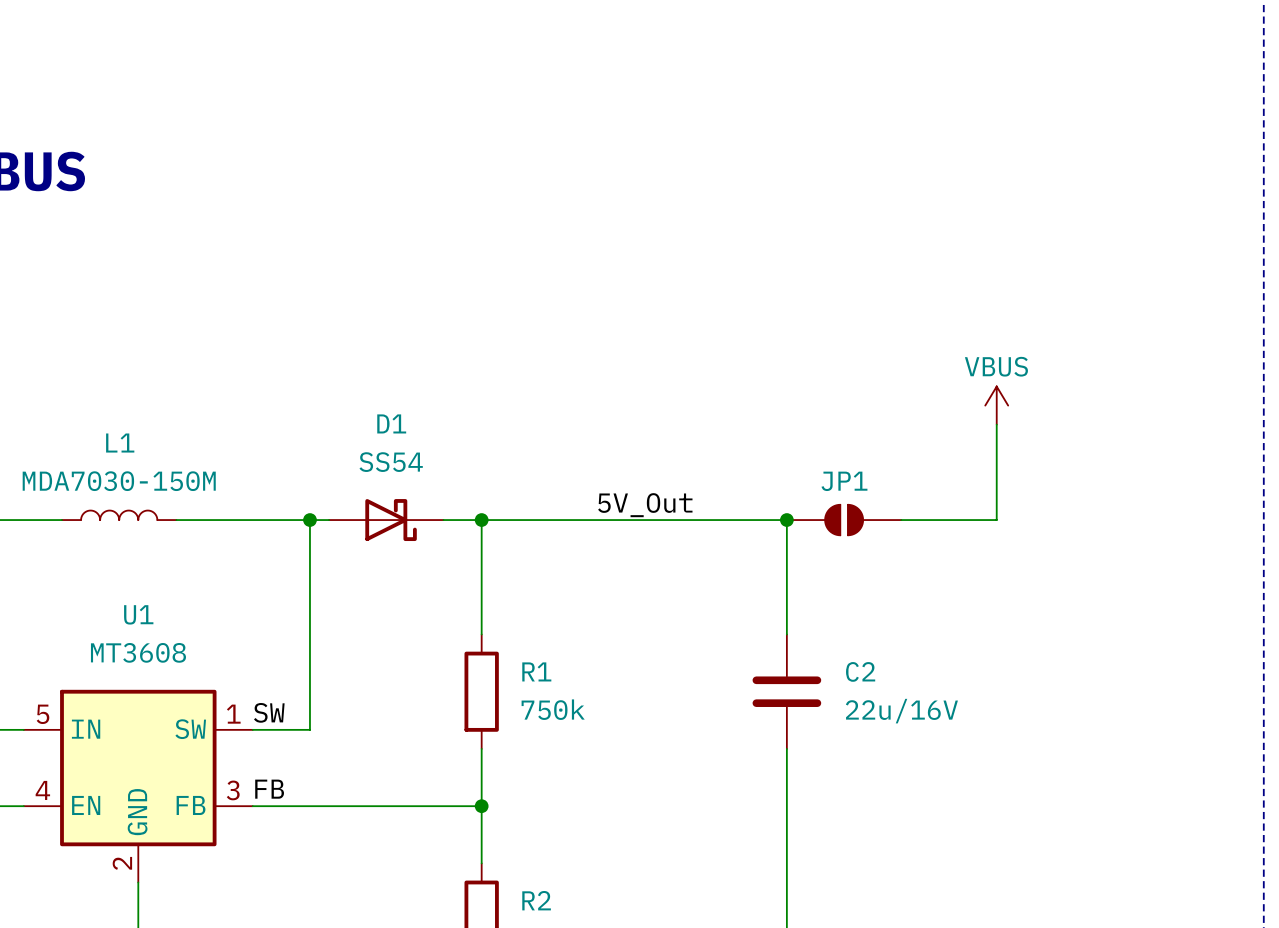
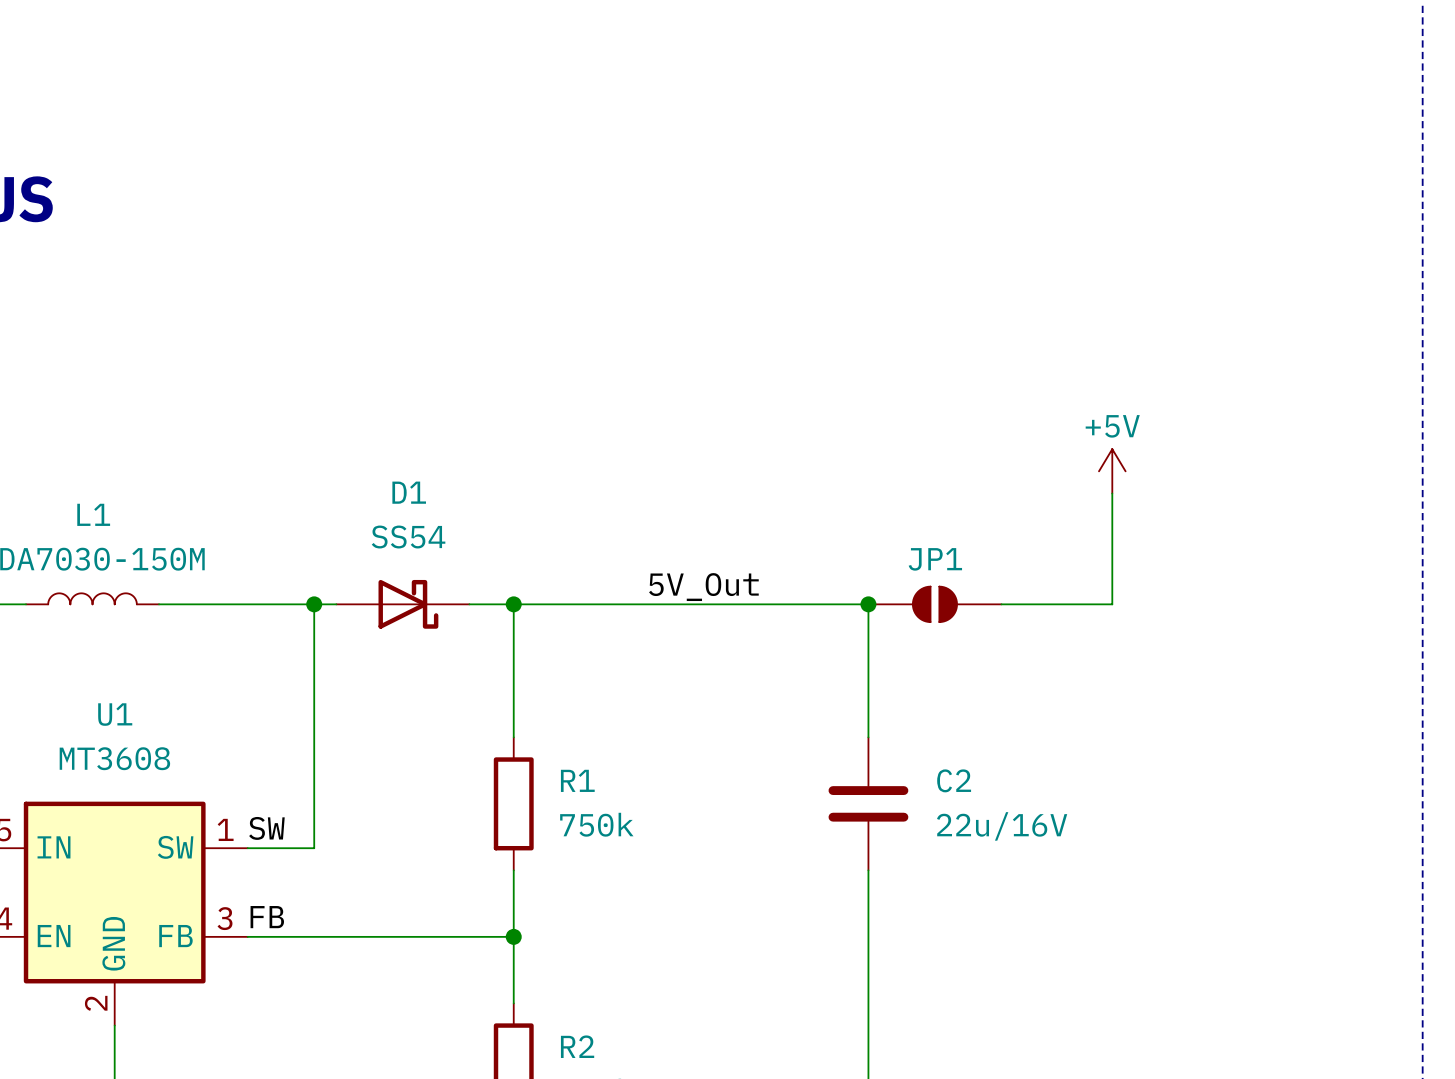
power symbol: VBUS (996, 405) -> +5V (1112, 471)

